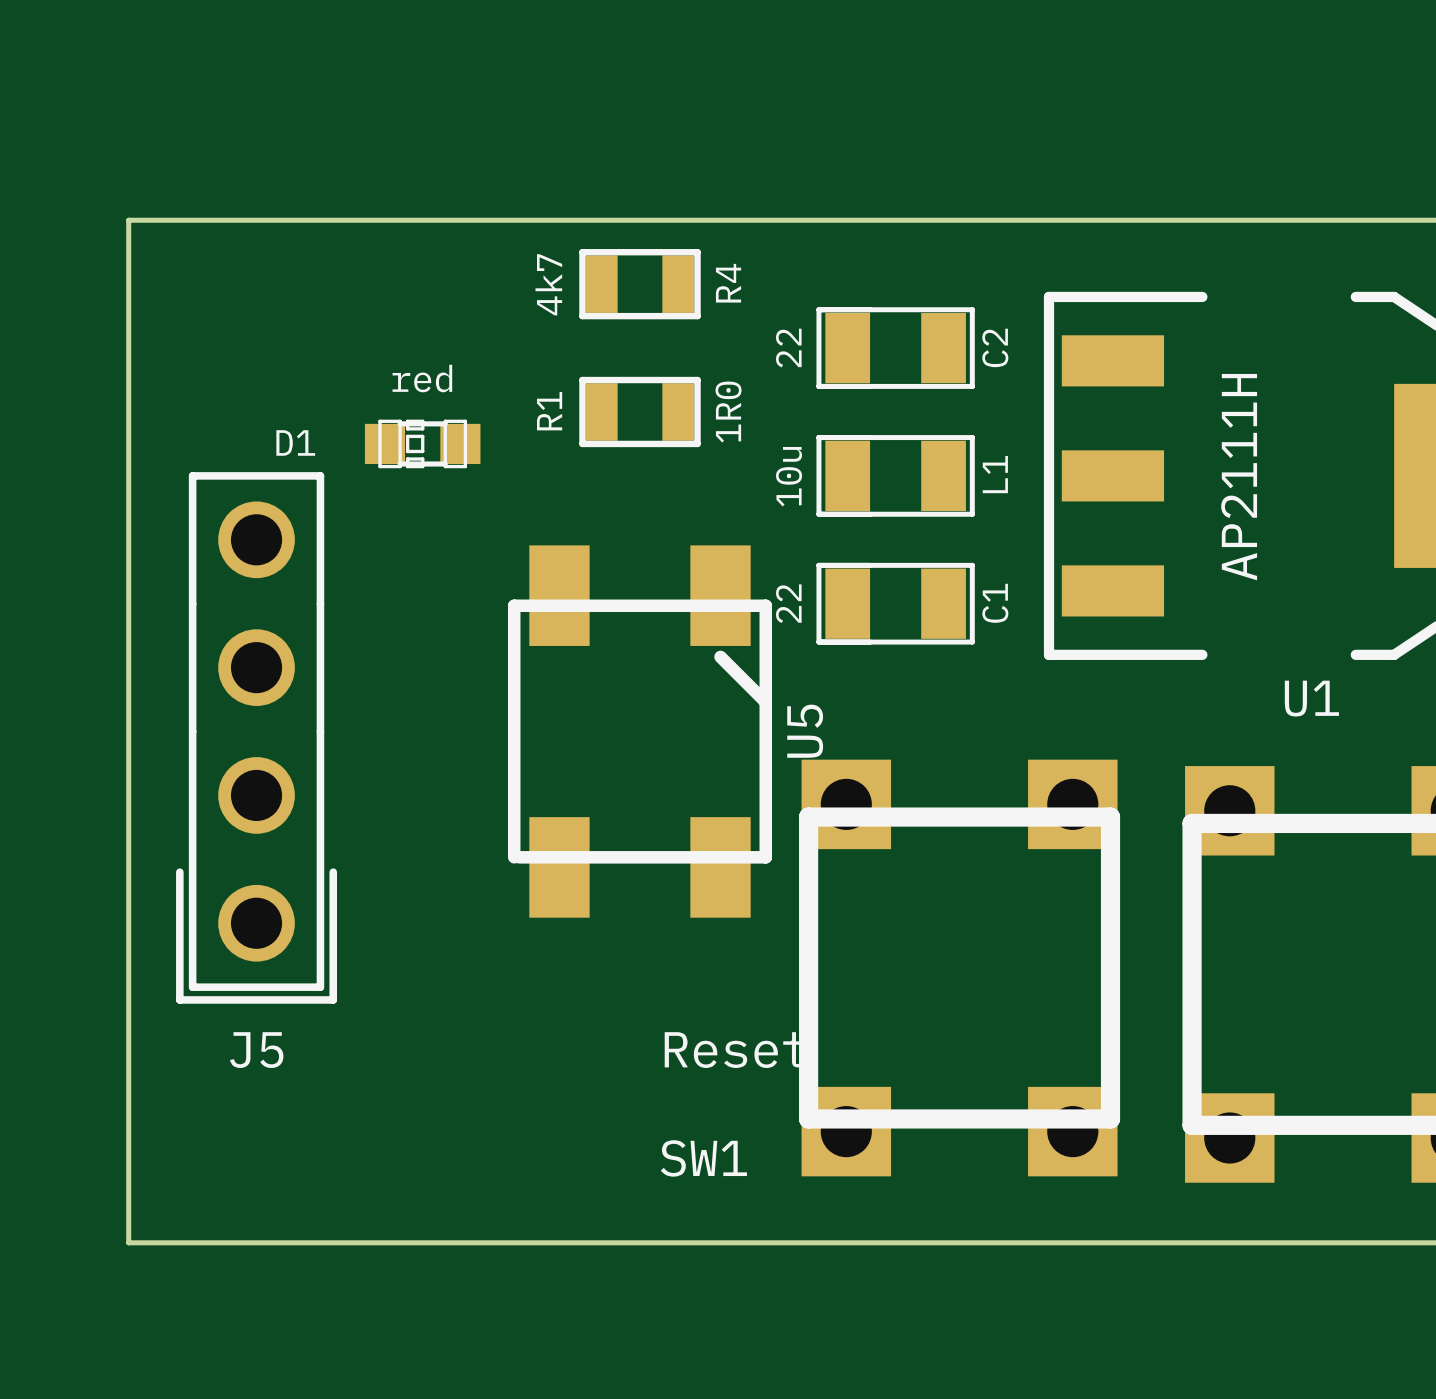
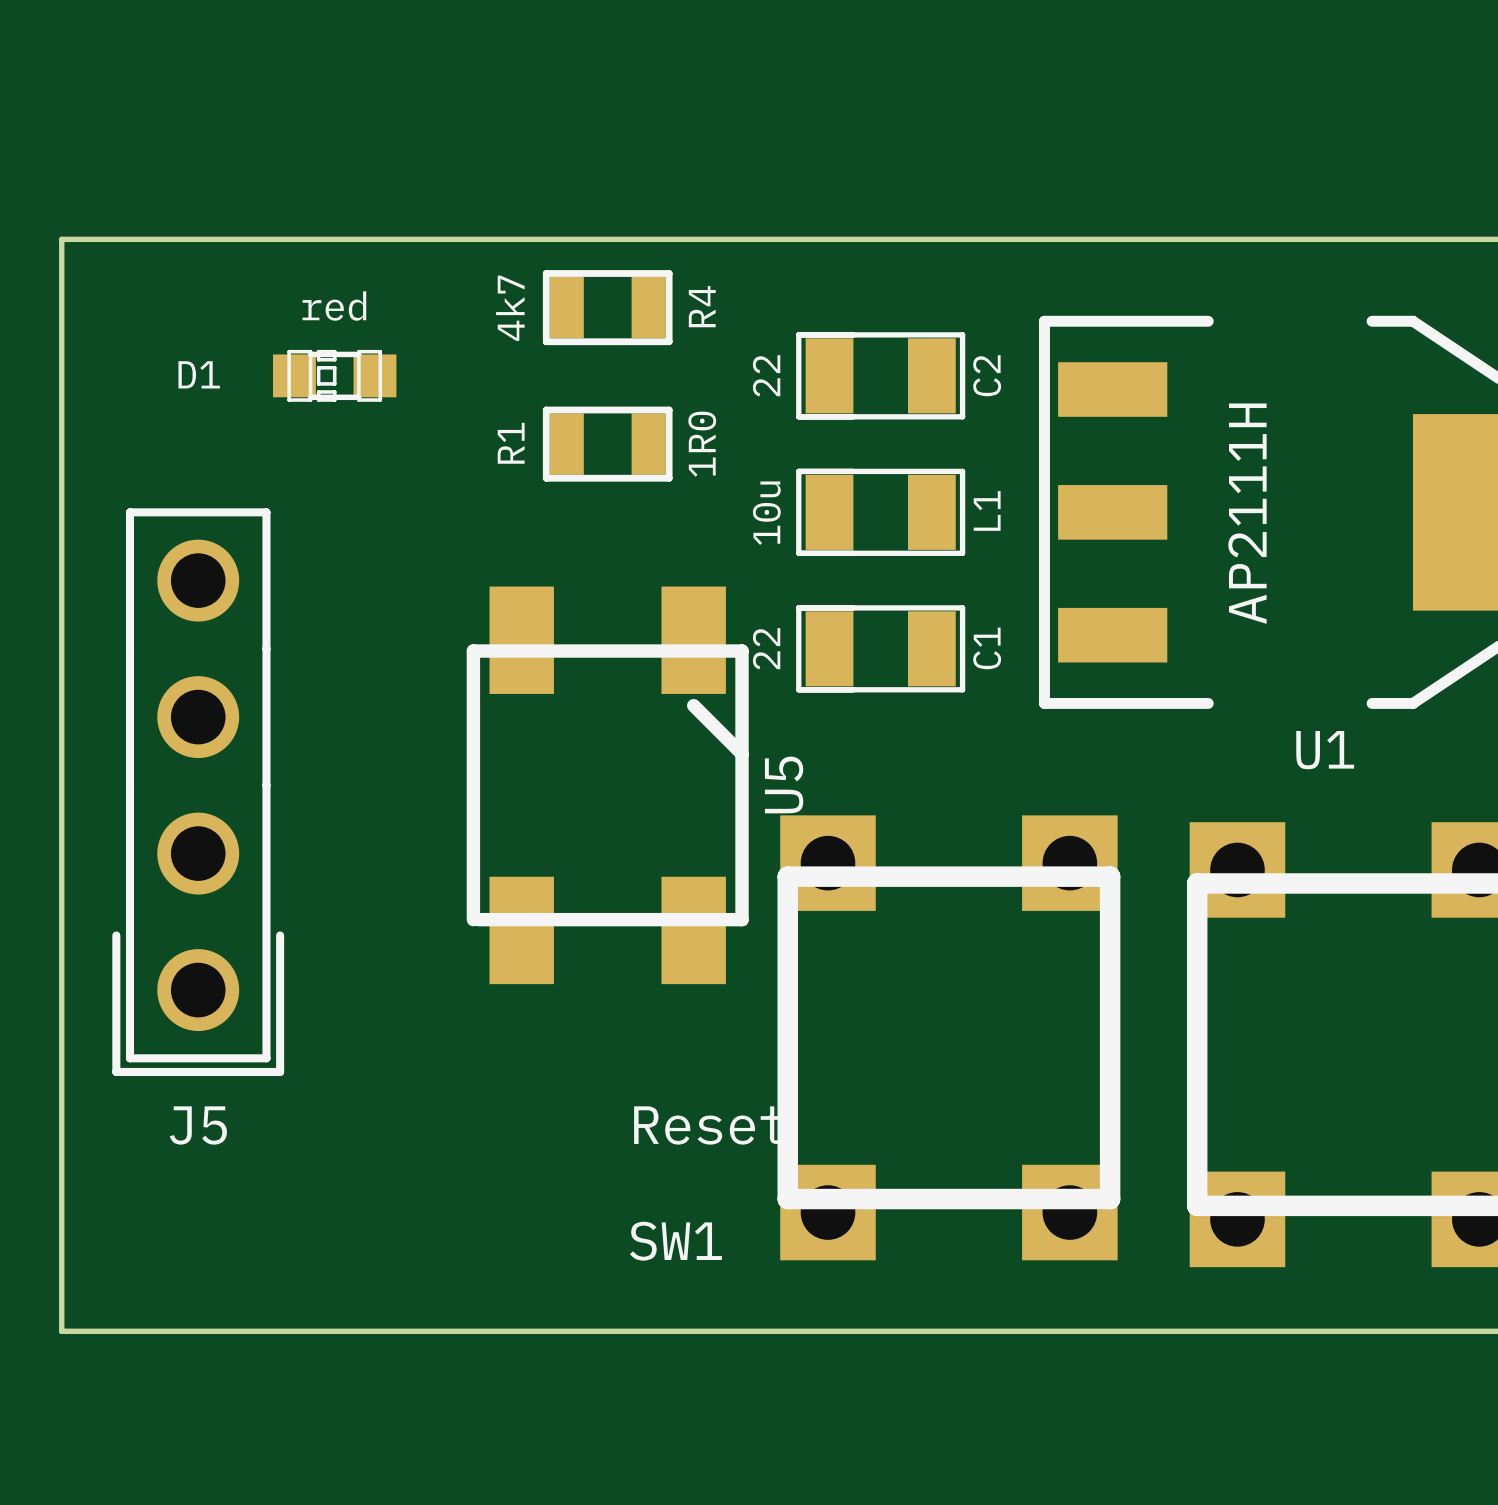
D1 position: (422, 443) -> (334, 375)

